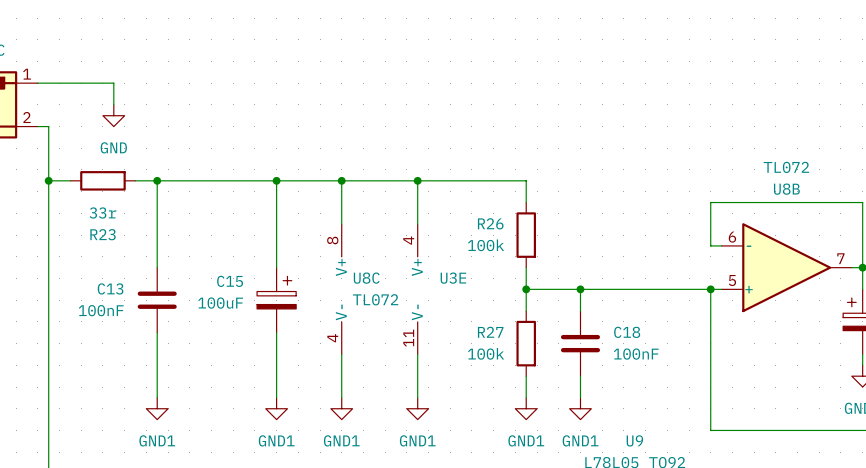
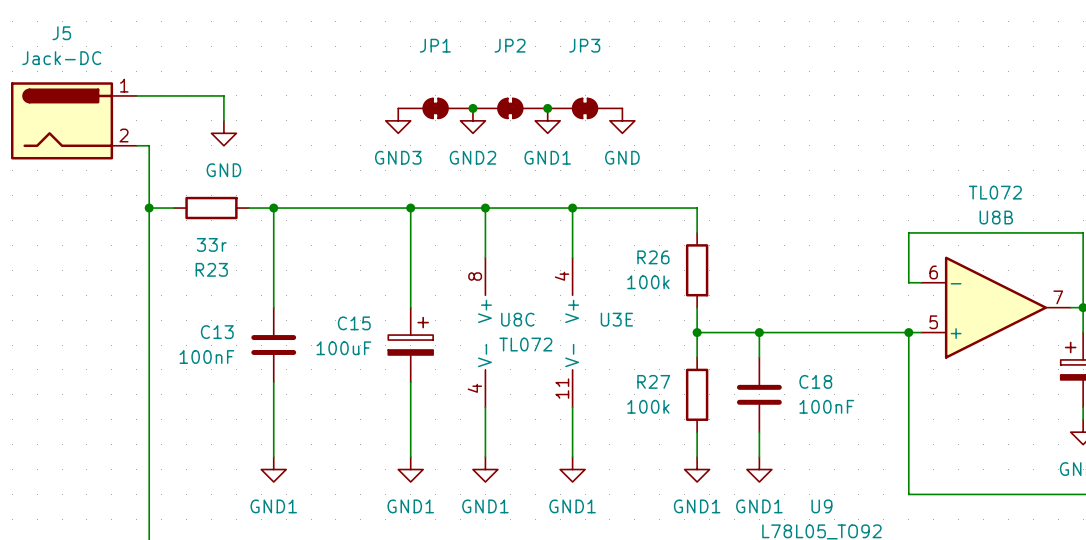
JP1: none -> (435, 108)
junction: none -> (472, 108)
JP2: none -> (510, 108)
junction: none -> (547, 108)
JP3: none -> (585, 108)
power symbol: none -> GND3 (398, 120)
power symbol: none -> GND2 (472, 120)
power symbol: none -> GND1 (547, 120)
power symbol: none -> GND (622, 120)

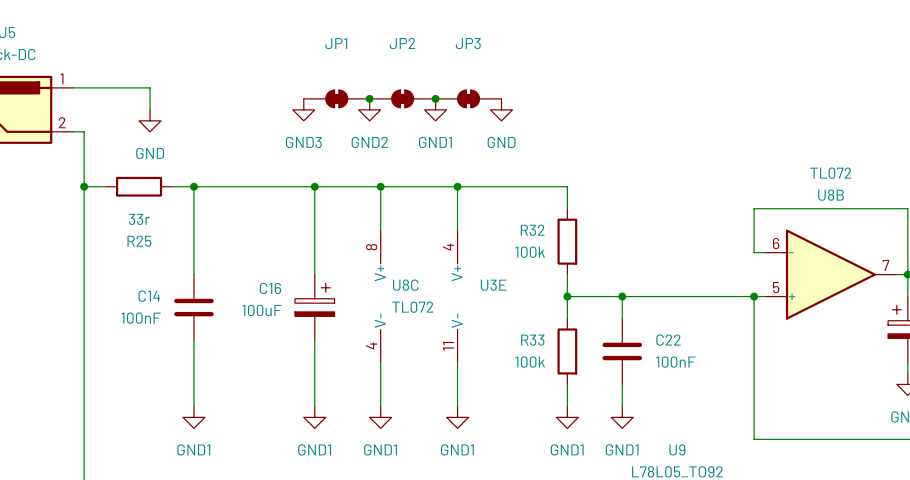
R26 name: R26 (653, 257) -> R32 (532, 230)
R23 name: R23 (211, 269) -> R25 (139, 241)
C15 name: C15 (354, 323) -> C16 (270, 288)
C13 name: C13 (217, 332) -> C14 (149, 296)
R27 name: R27 (653, 381) -> R33 (532, 340)
C18 name: C18 (815, 381) -> C22 (668, 340)

